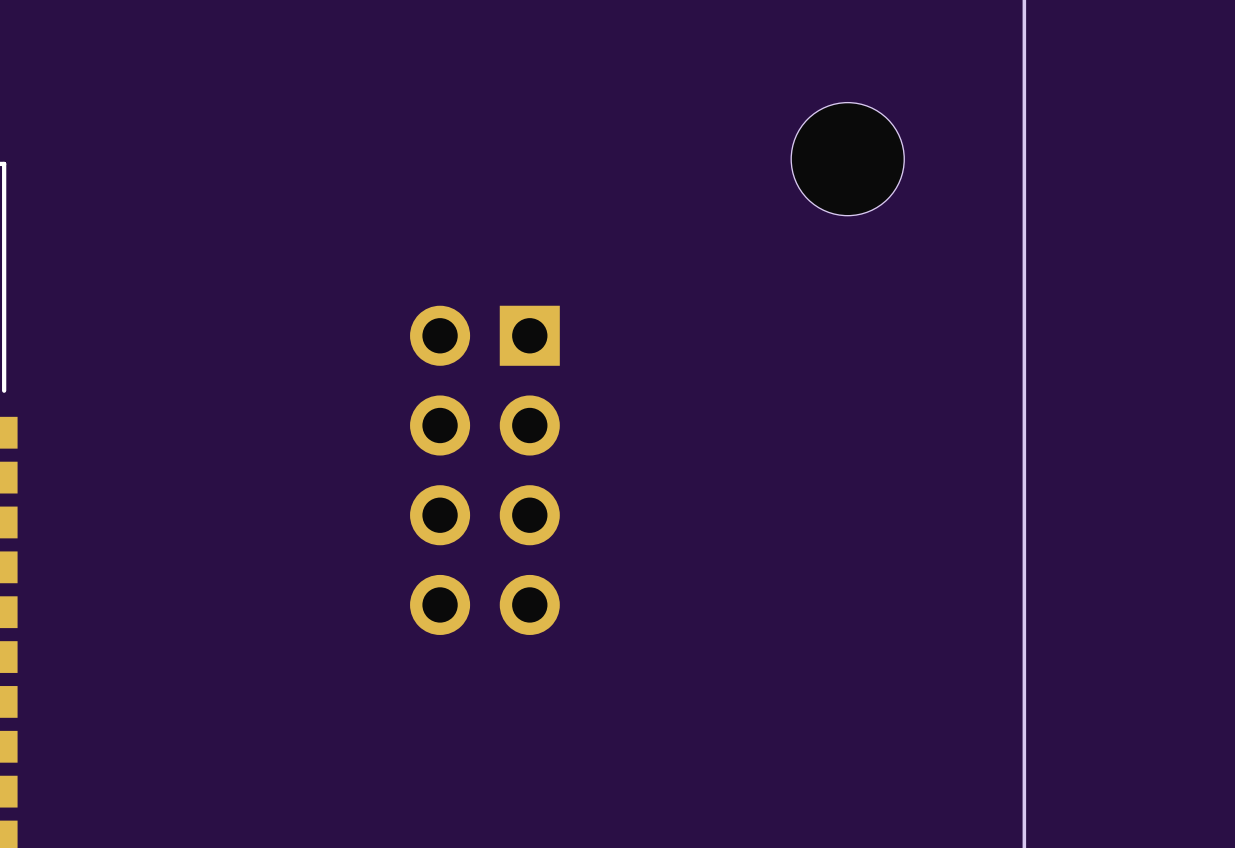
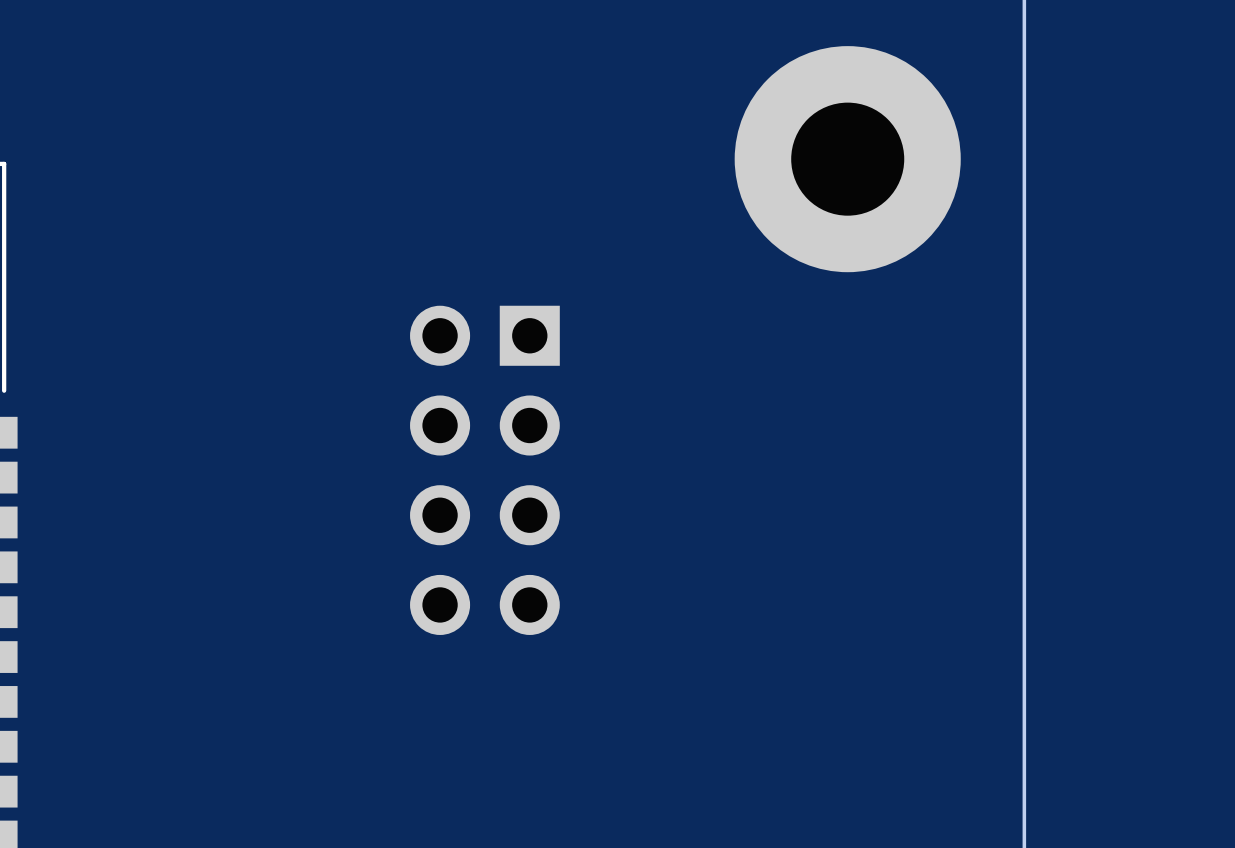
part footprint: [791, 102, 905, 216] -> [734, 46, 961, 273]

